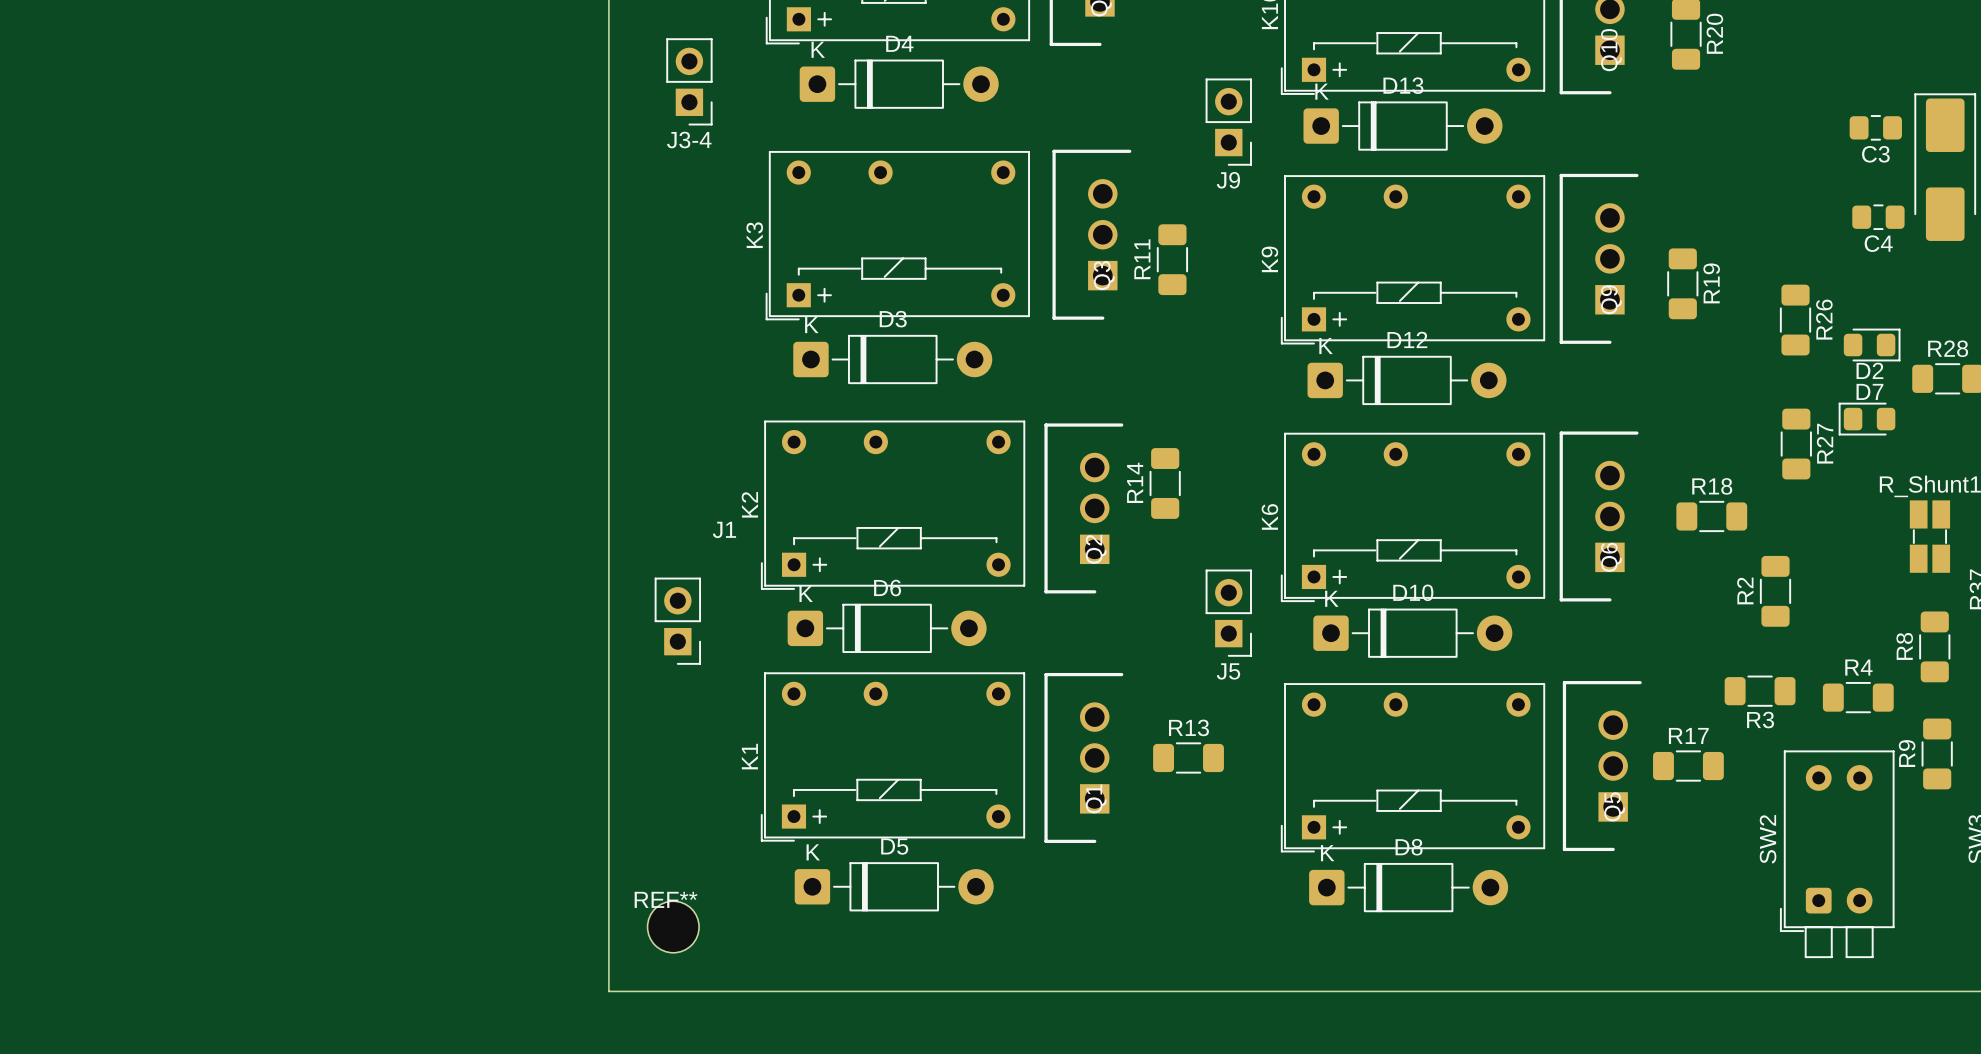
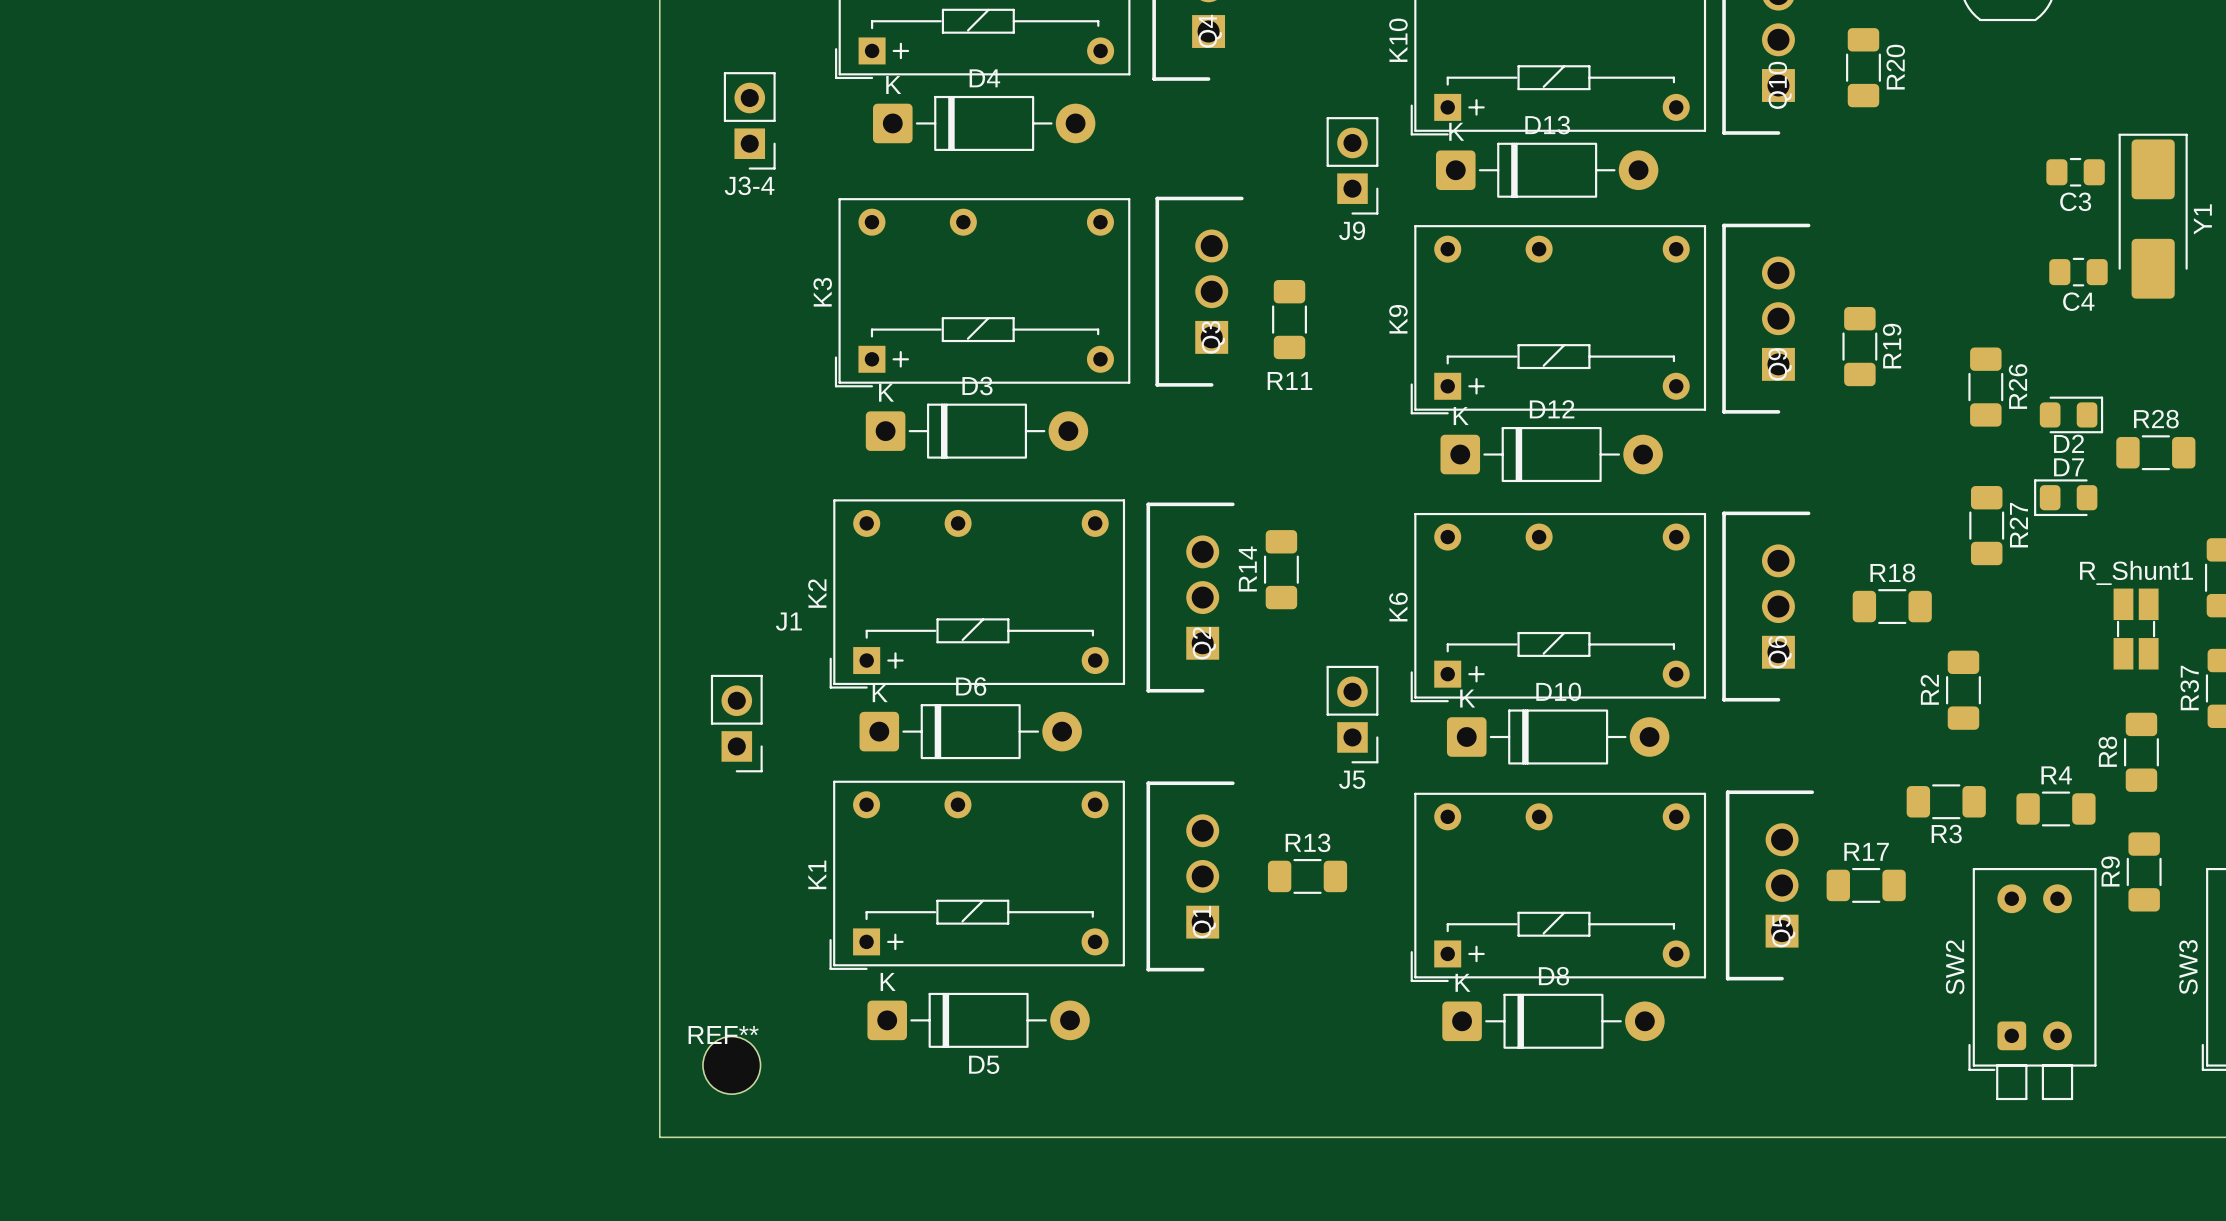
R11 name rotation: 0° (1142, 259) -> 90° clockwise (1289, 380)
R11 name position: R11 (1142, 259) -> R11 (1289, 380)
D5 name position: D5 (894, 846) -> D5 (984, 1064)

